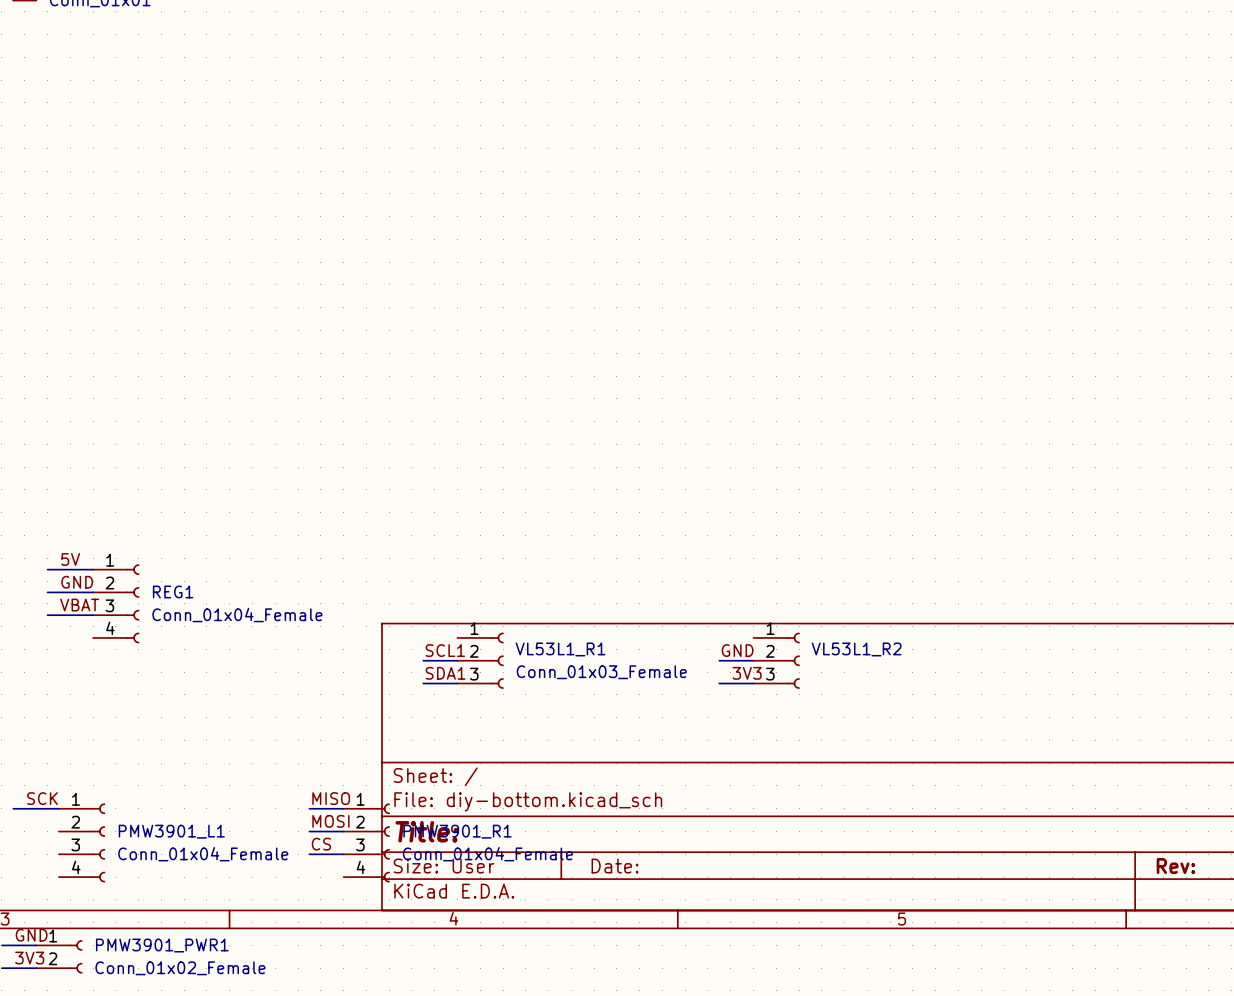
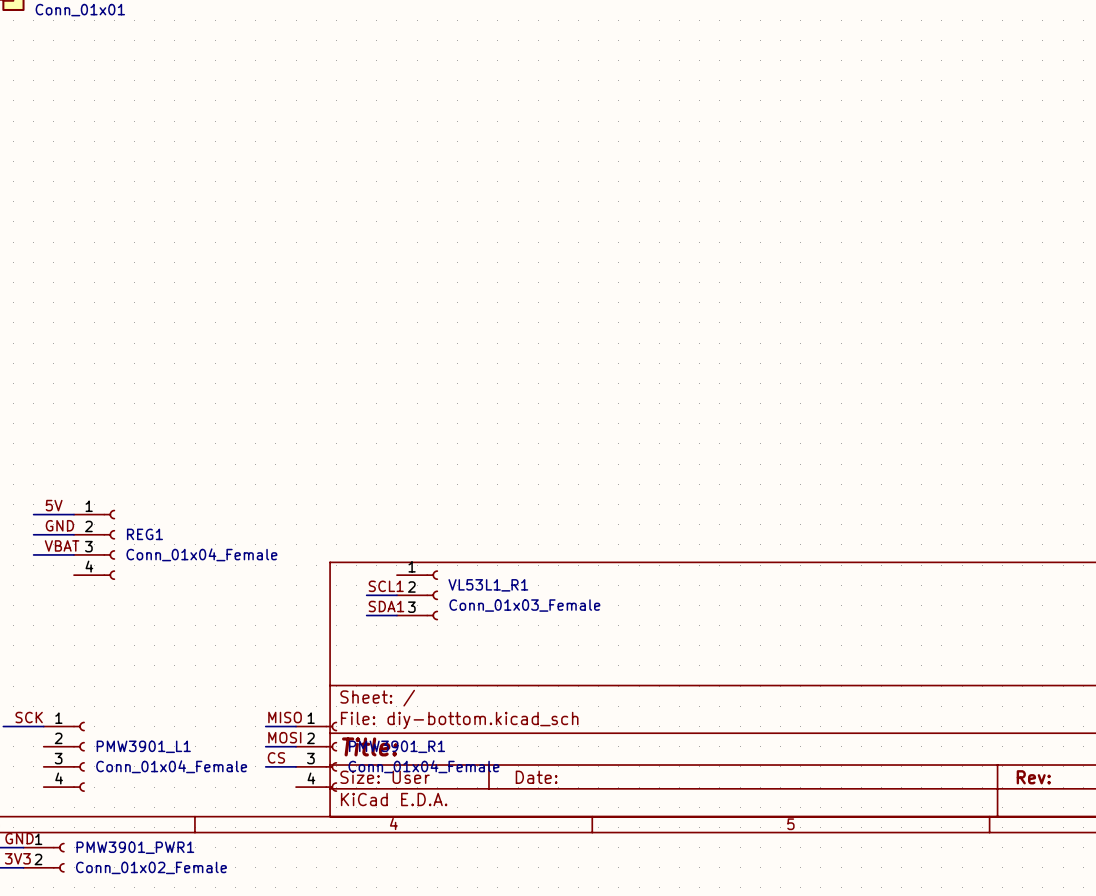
label: GND (737, 650) -> none
wire: (719, 660) (753, 660) -> none
VL53L1_R2: (776, 660) -> none
label: 3V3 (747, 673) -> none
wire: (719, 683) (753, 683) -> none

